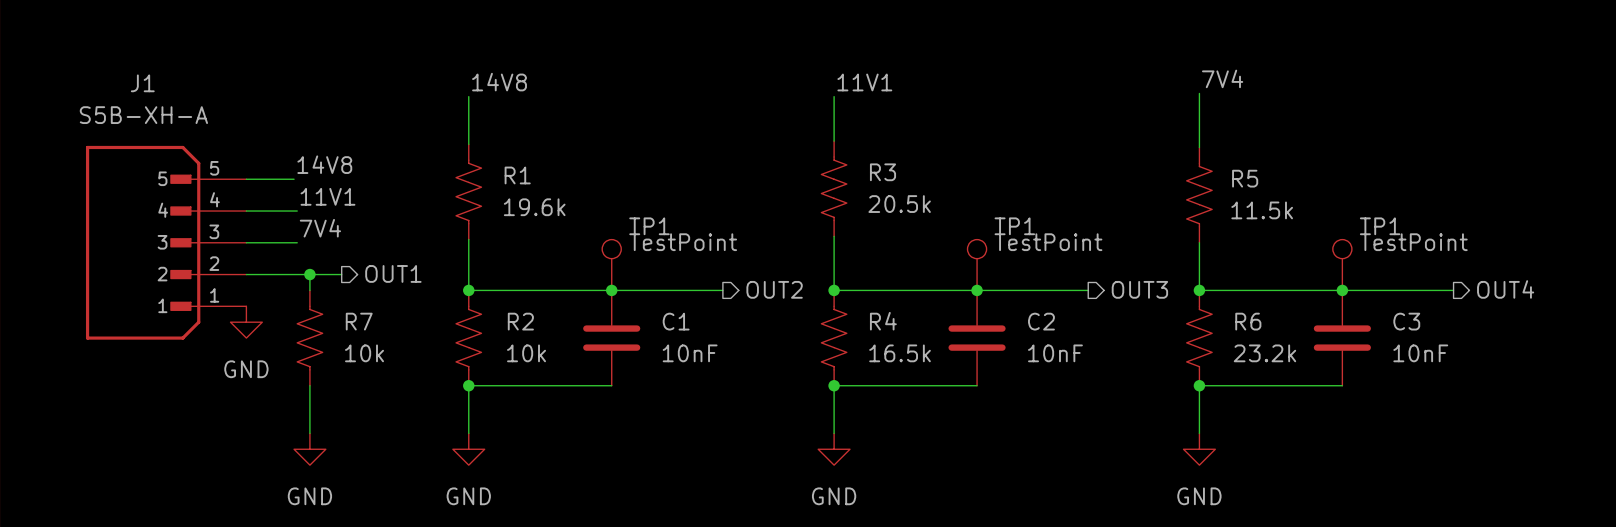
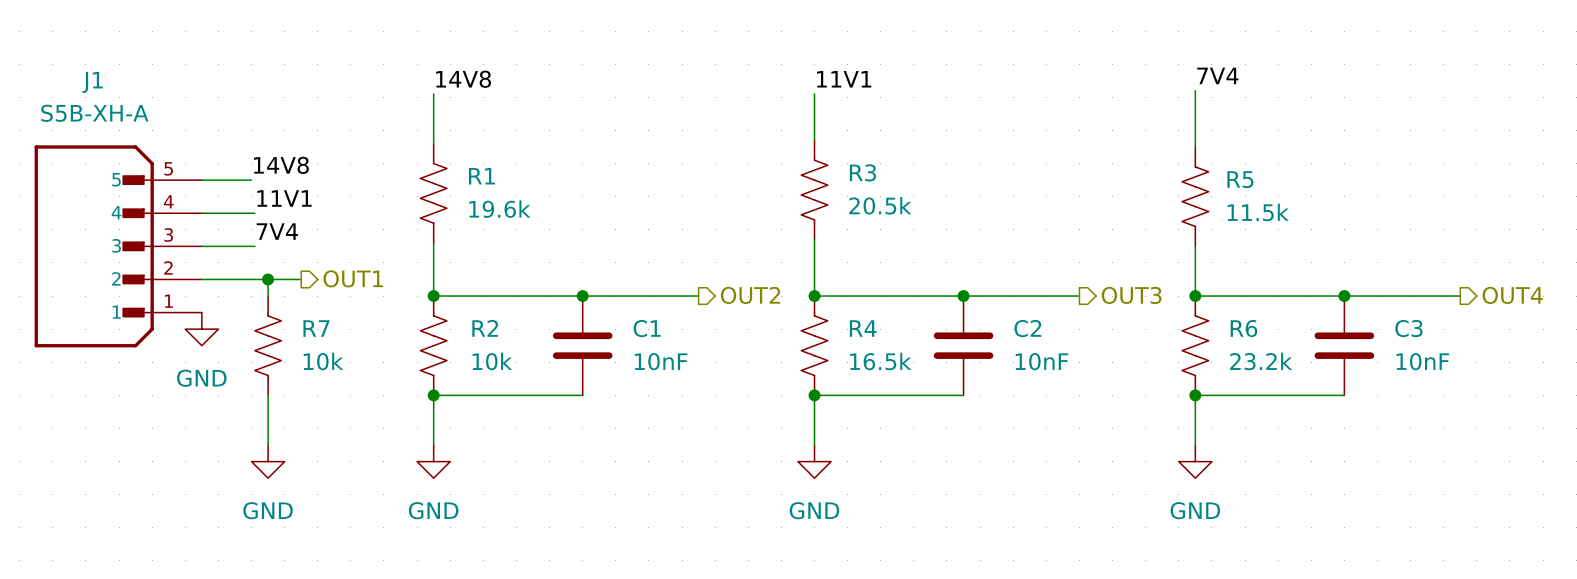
TP1: TestPoint (611, 265) -> none
TP1: TestPoint (977, 265) -> none
TP1: TestPoint (1342, 265) -> none

